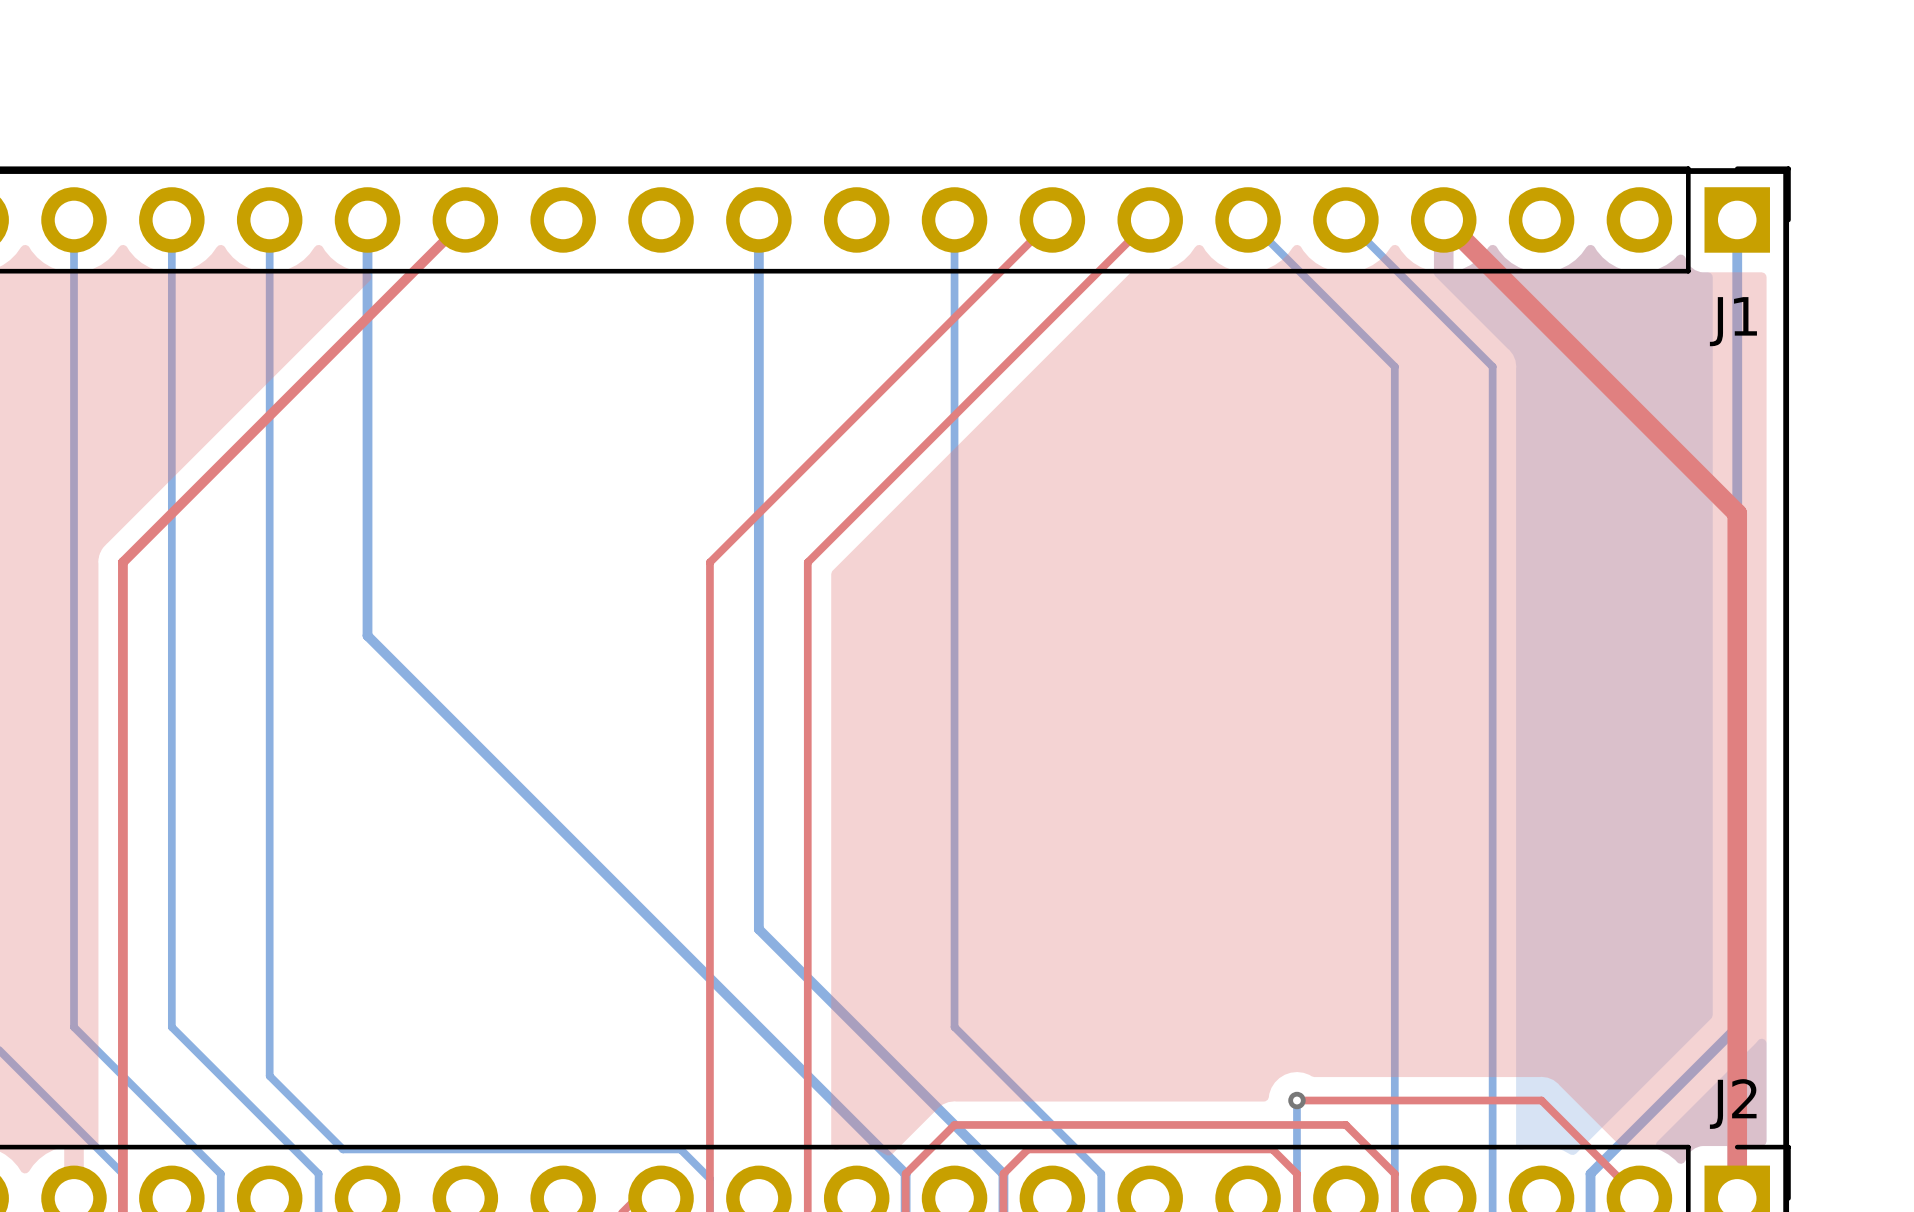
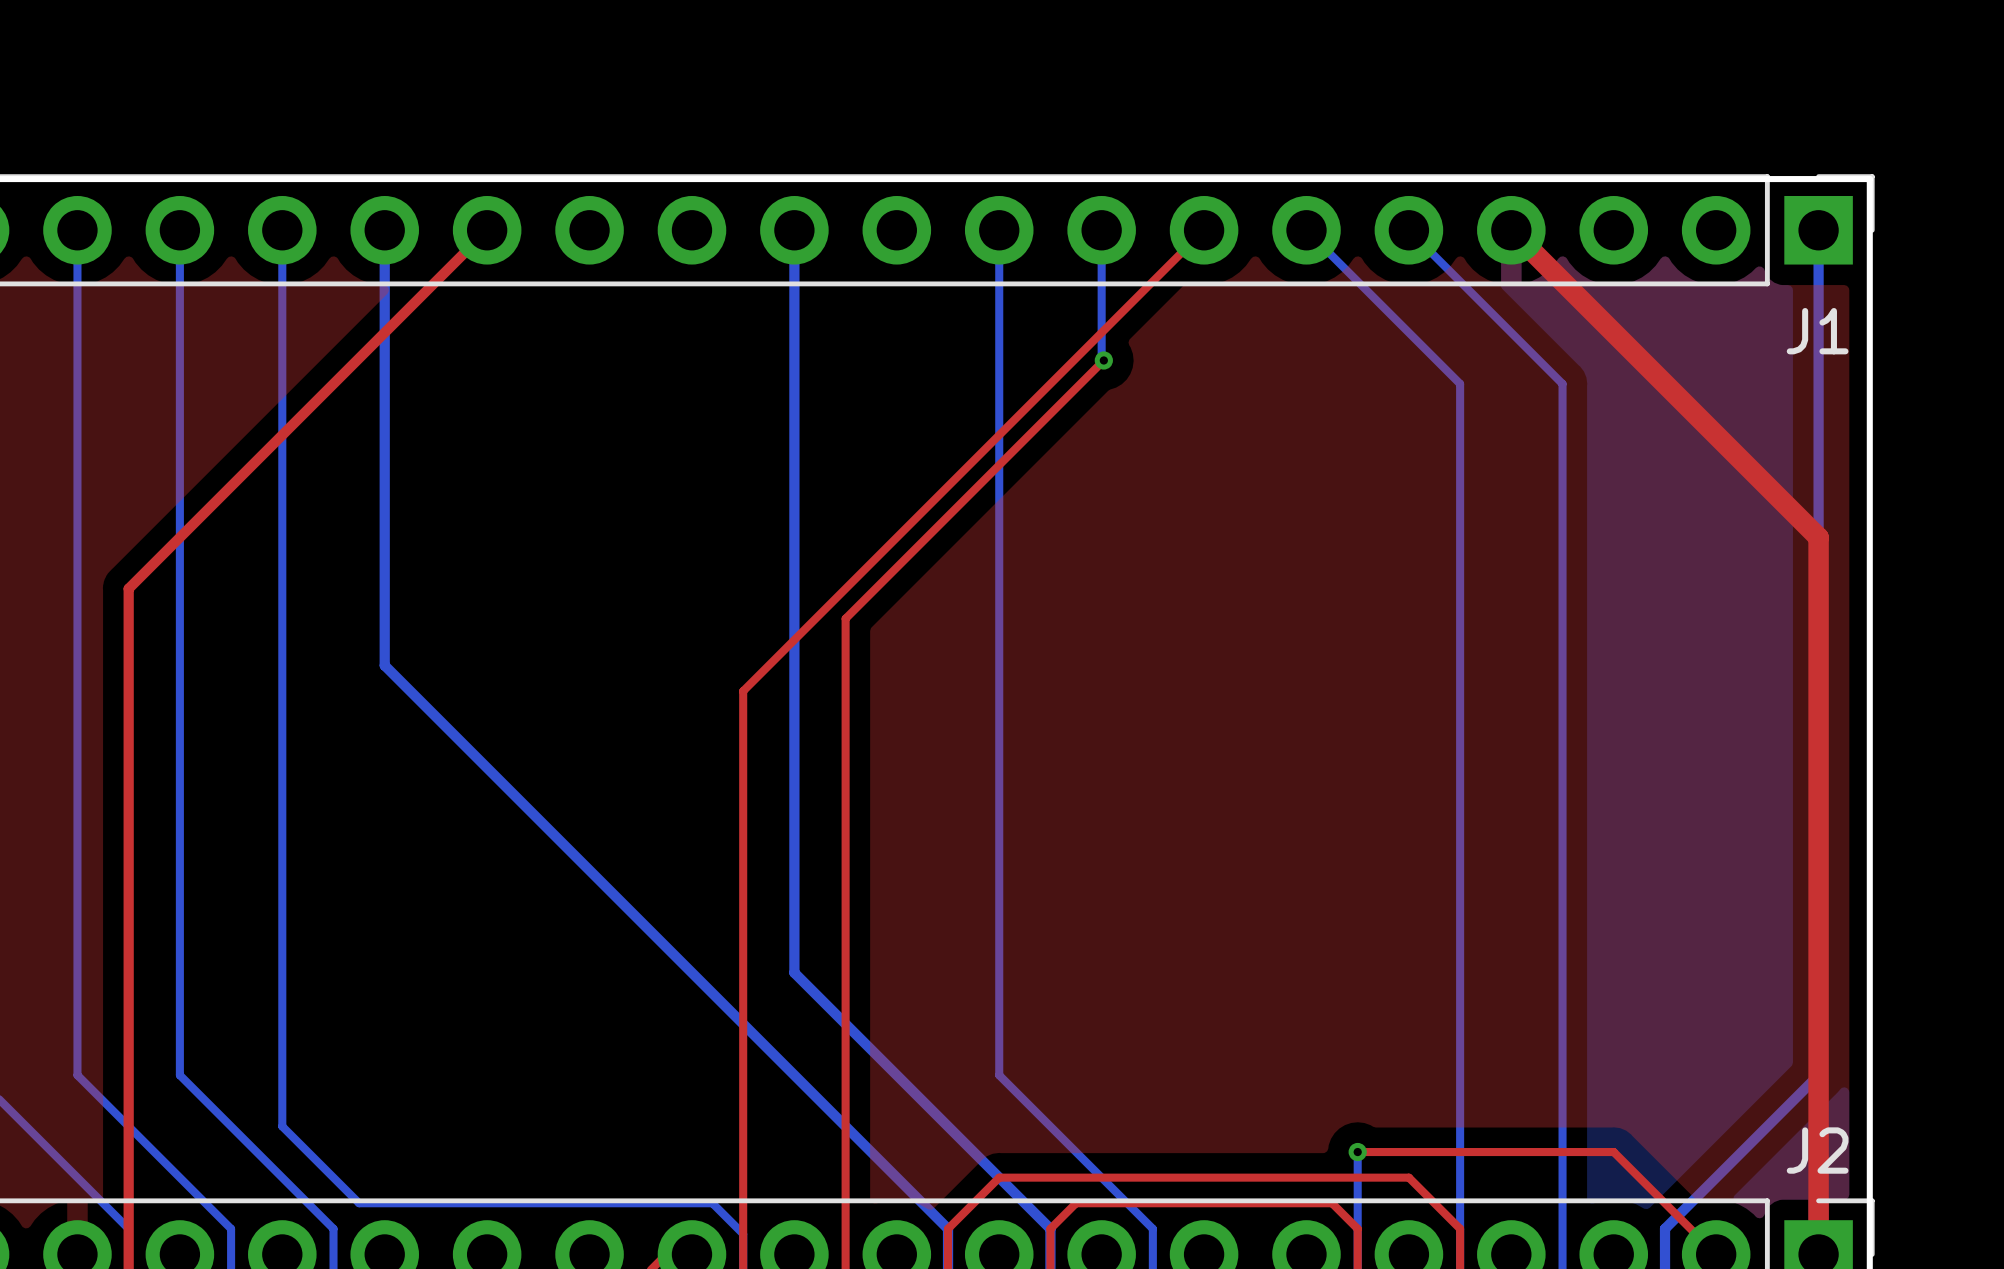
top track: (1052, 219) (709, 562) (709, 660) -> none
bottom track: none -> (1101, 230) (1101, 358) (1103, 360)
top track: none -> (1103, 360) (845, 618)
via: none -> (1103, 360)
top track: (807, 562) (807, 591) -> (845, 588) (743, 691)

